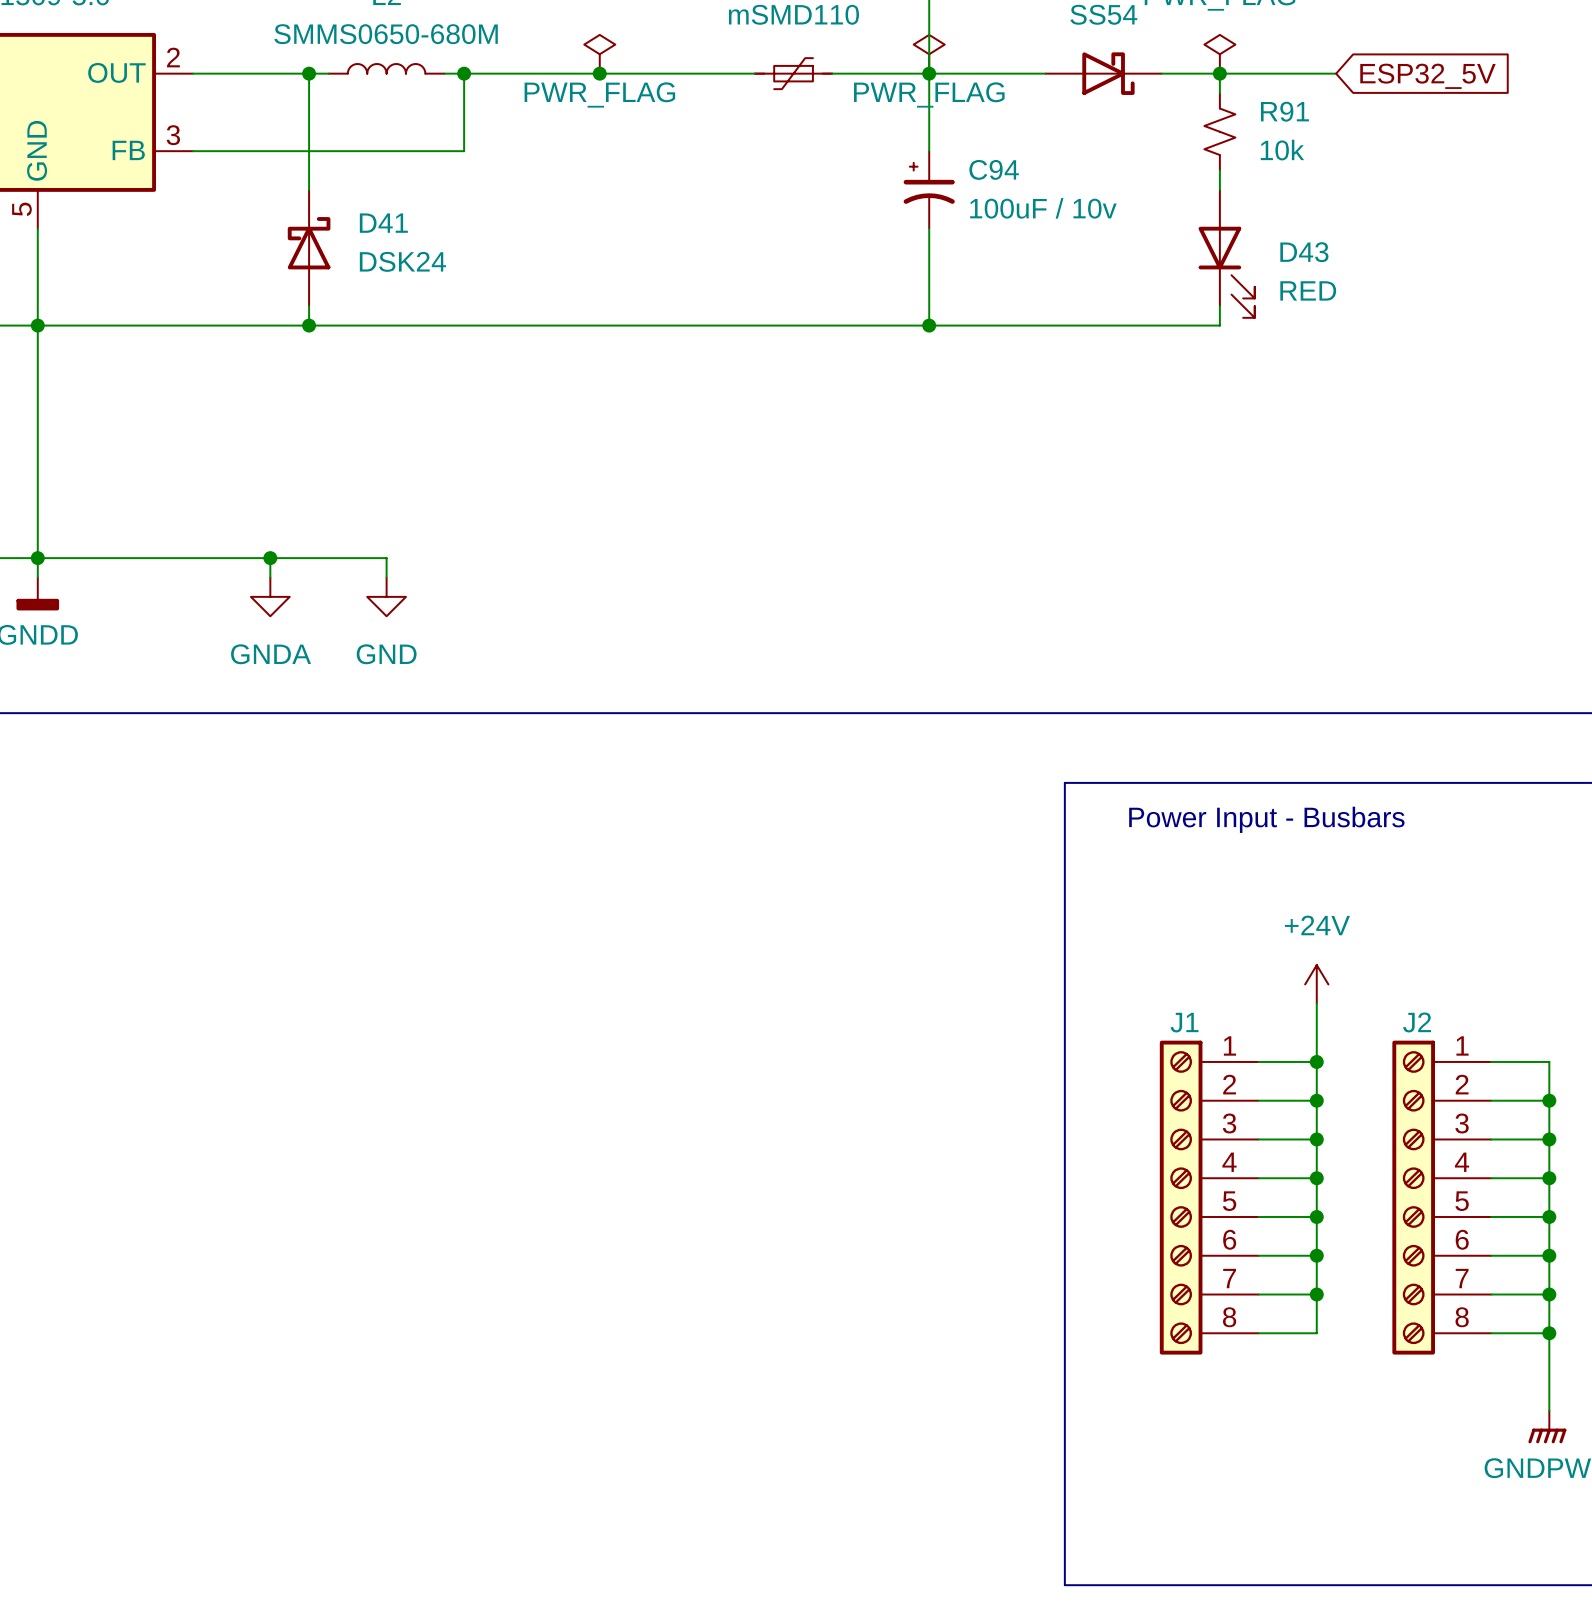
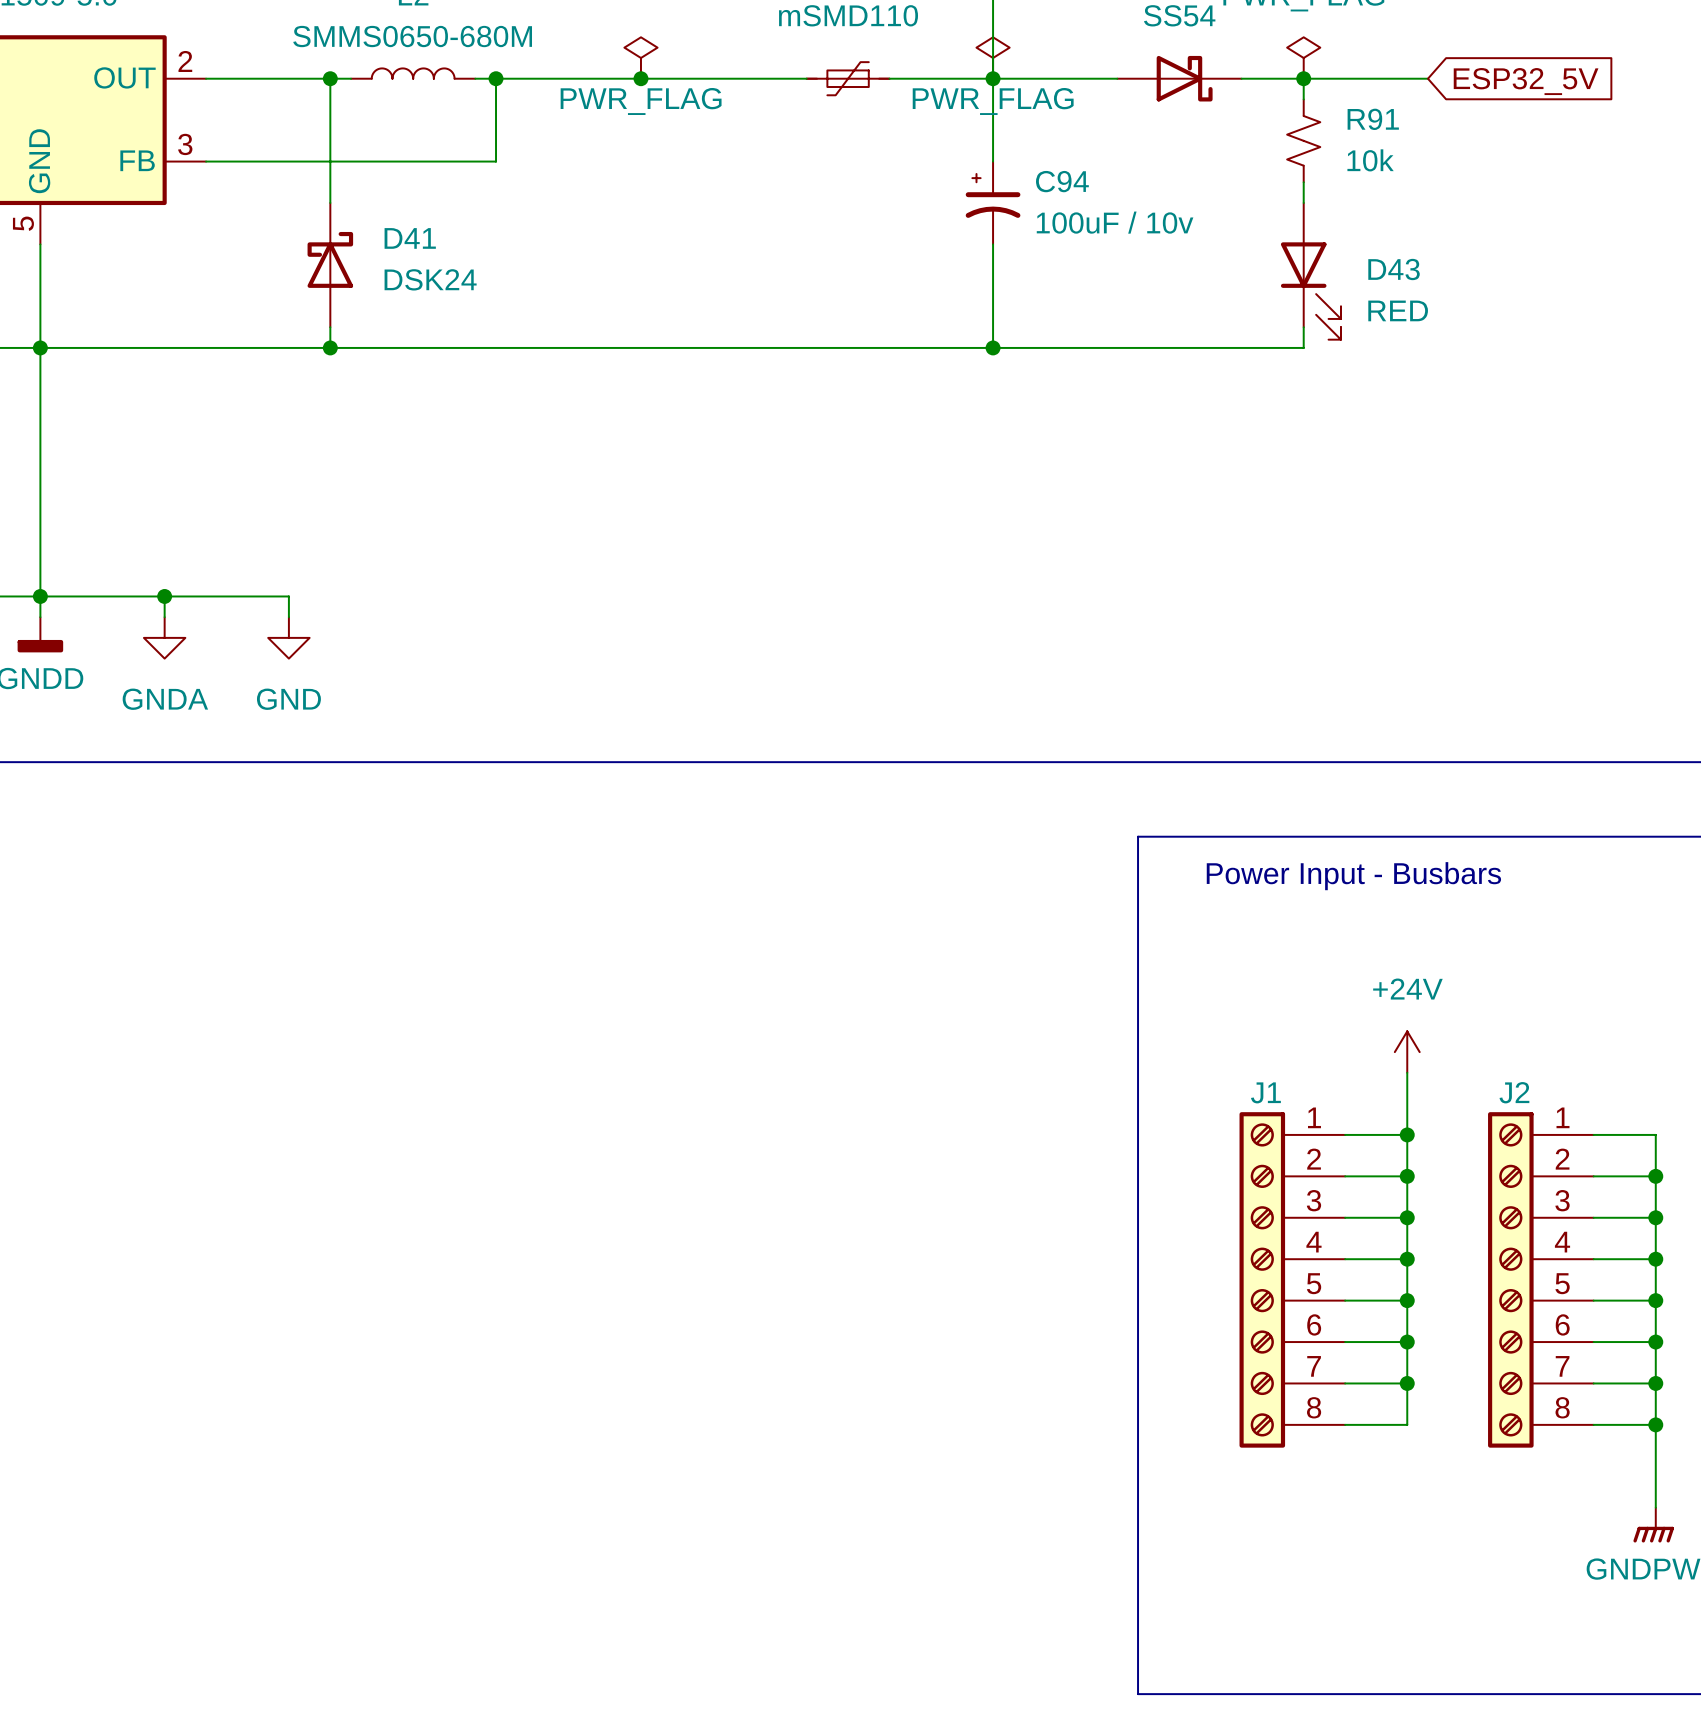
wire: none -> (164, 596) (164, 617)
junction: none -> (164, 596)
wire: (270, 558) (386, 558) (386, 577) -> none
junction: (270, 558) -> none
power symbol: none -> GNDA (164, 637)
power symbol: GNDA (270, 596) -> GND (288, 637)
power symbol: GND (386, 596) -> none

